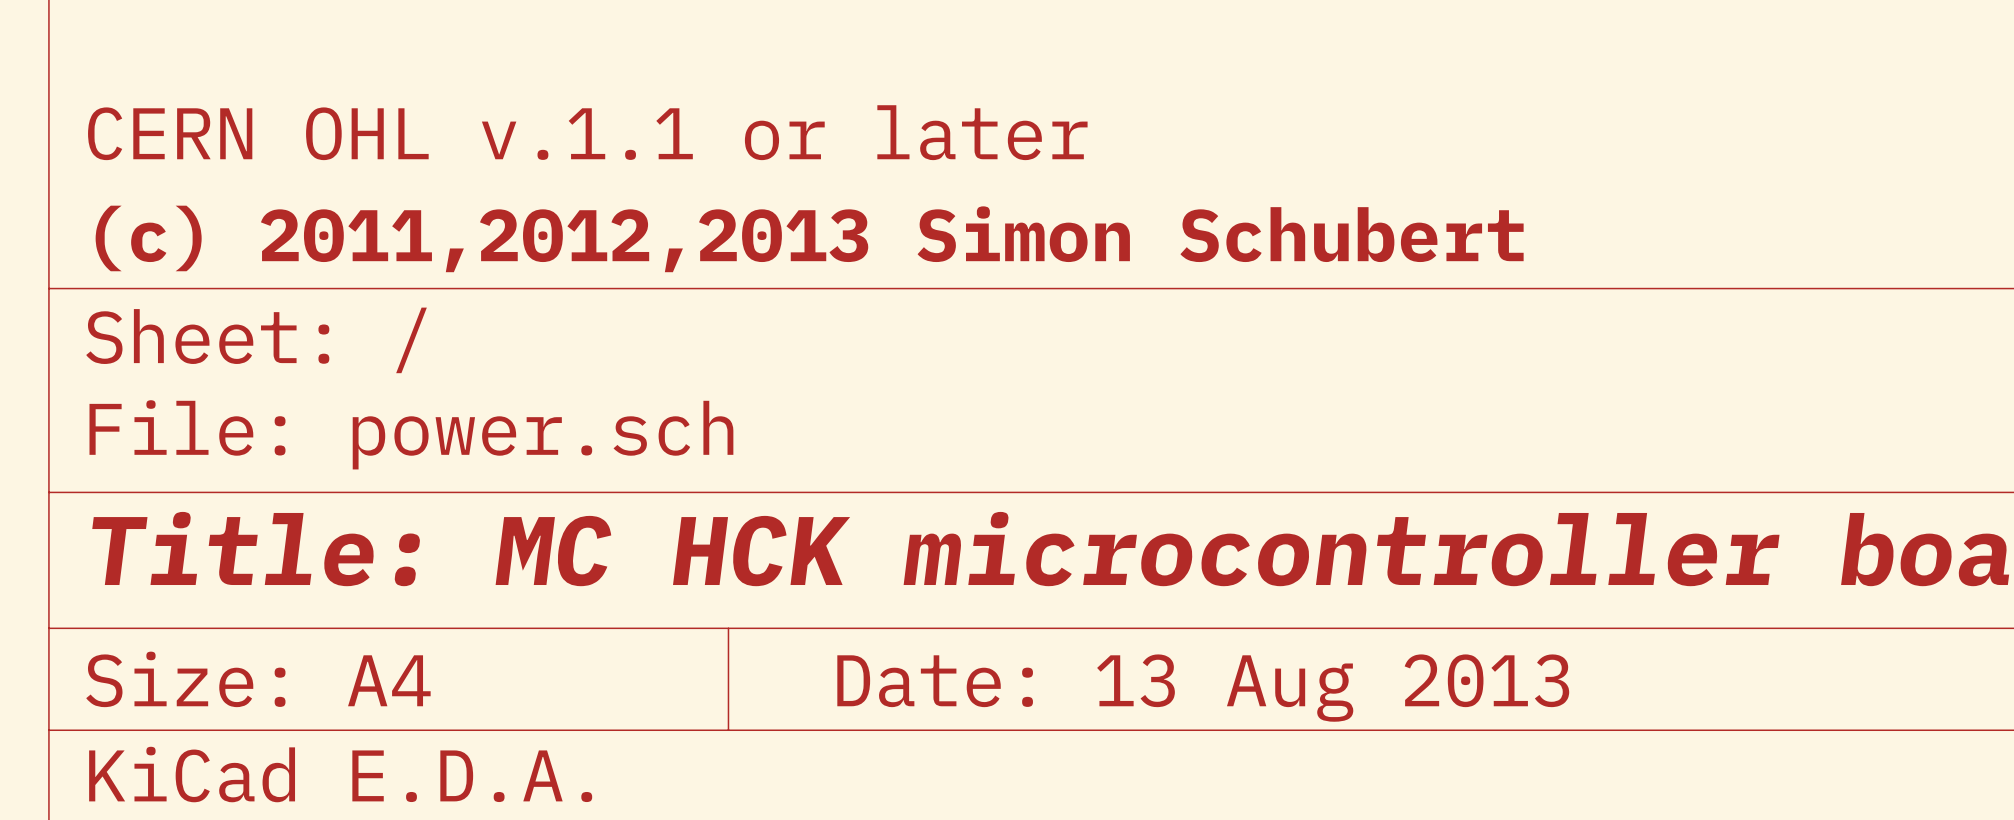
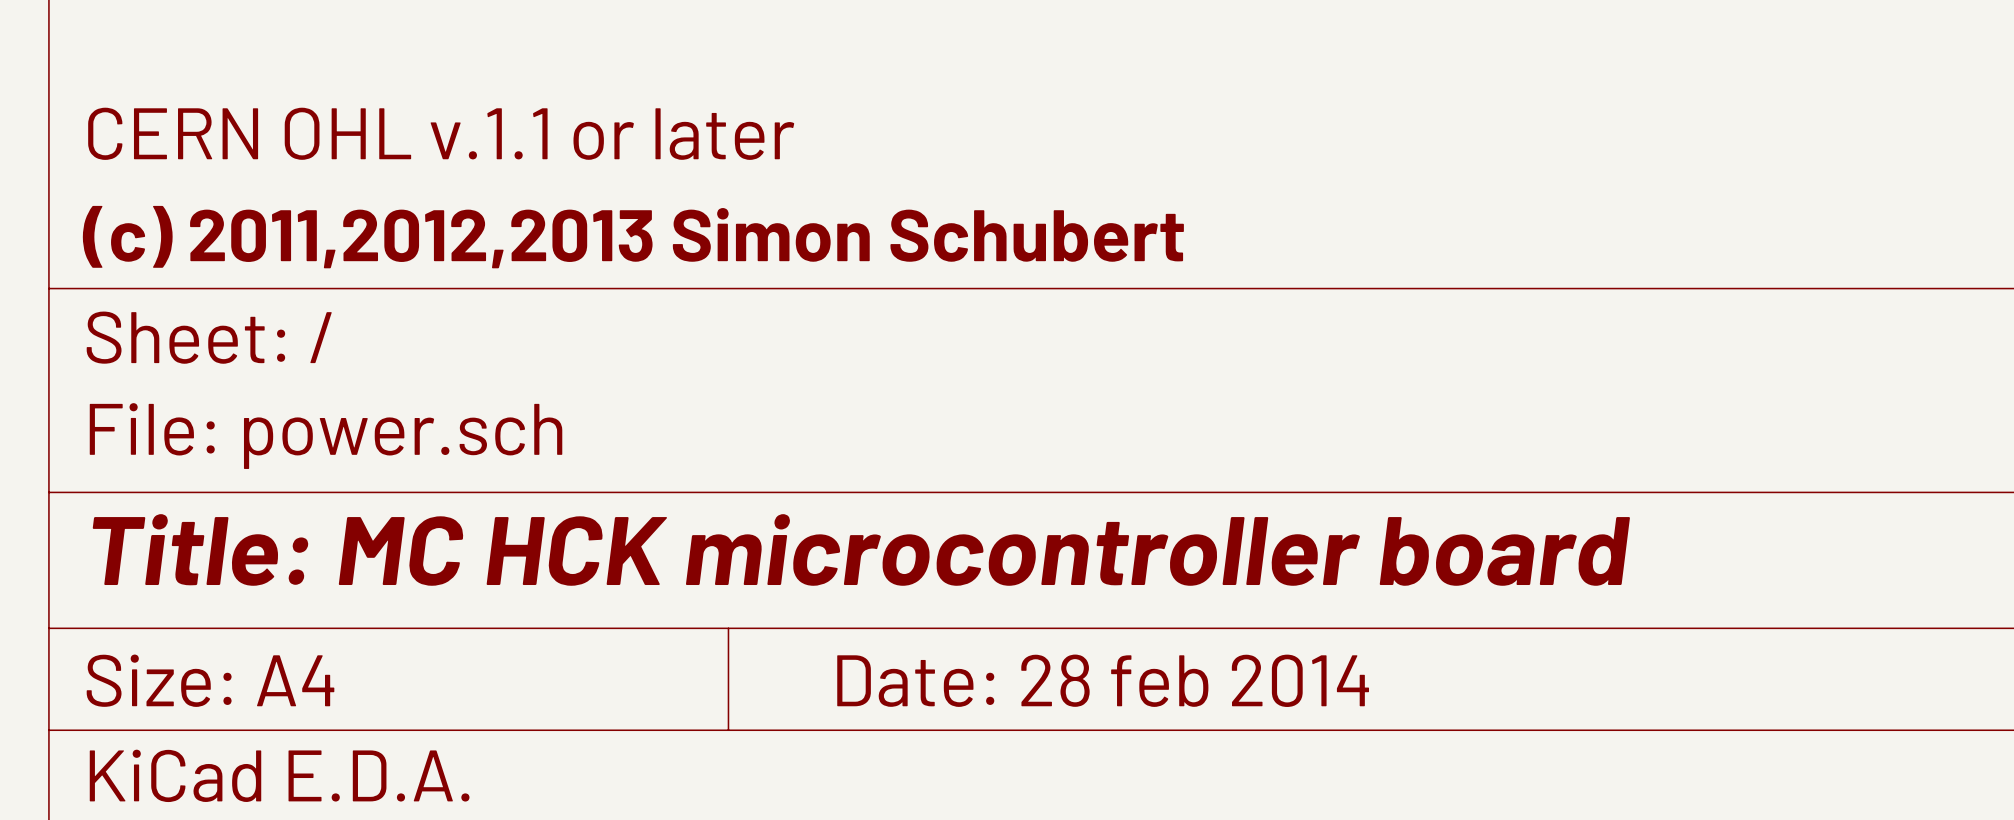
title block: Date: 13 Aug 2013 (1203, 688) -> Date: 28 feb 2014 (1103, 680)

